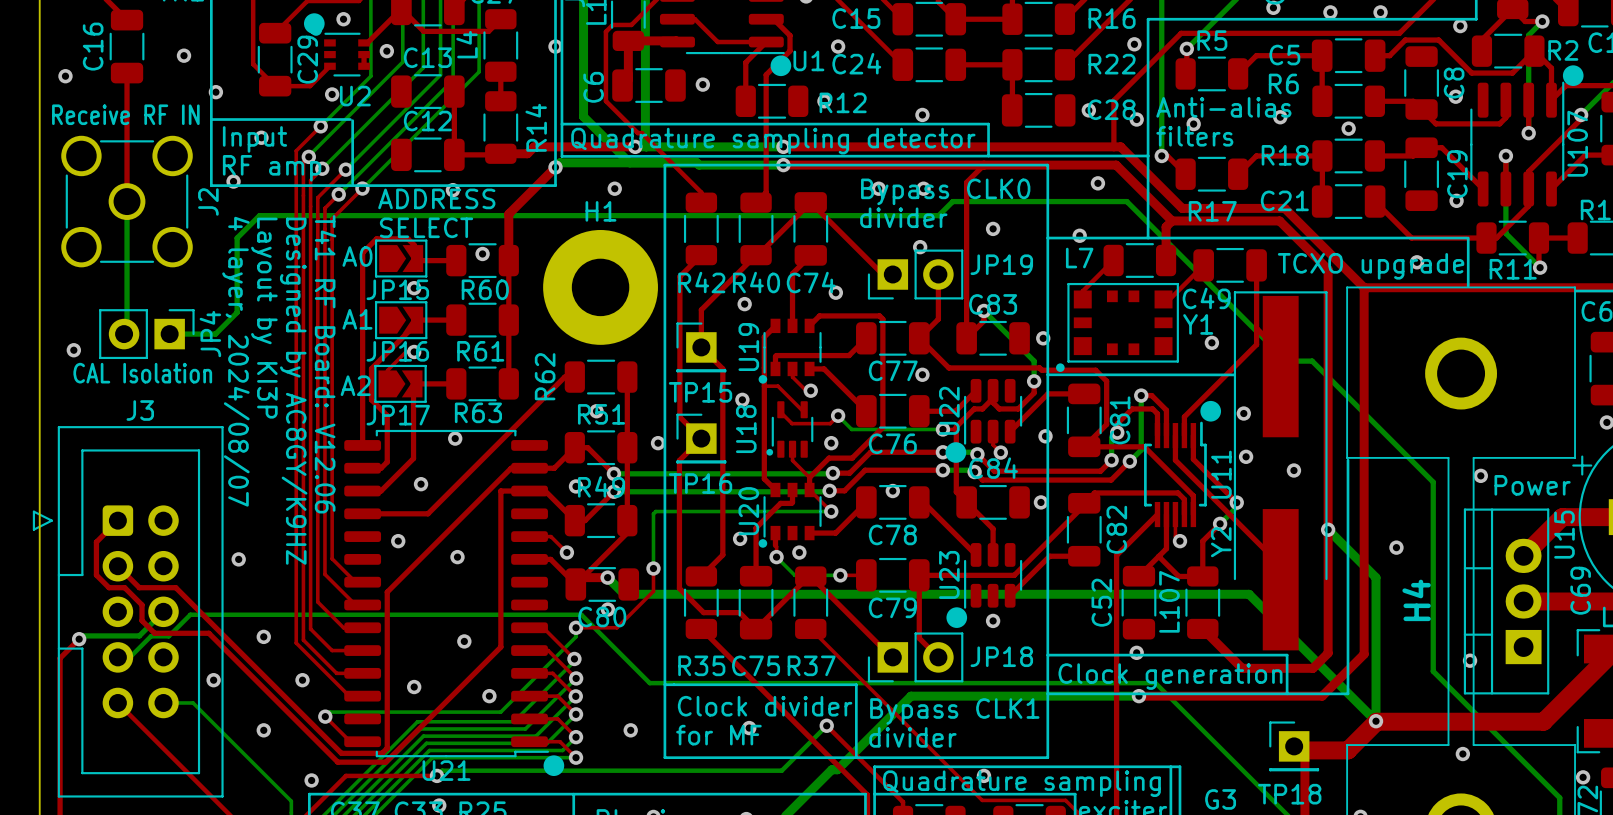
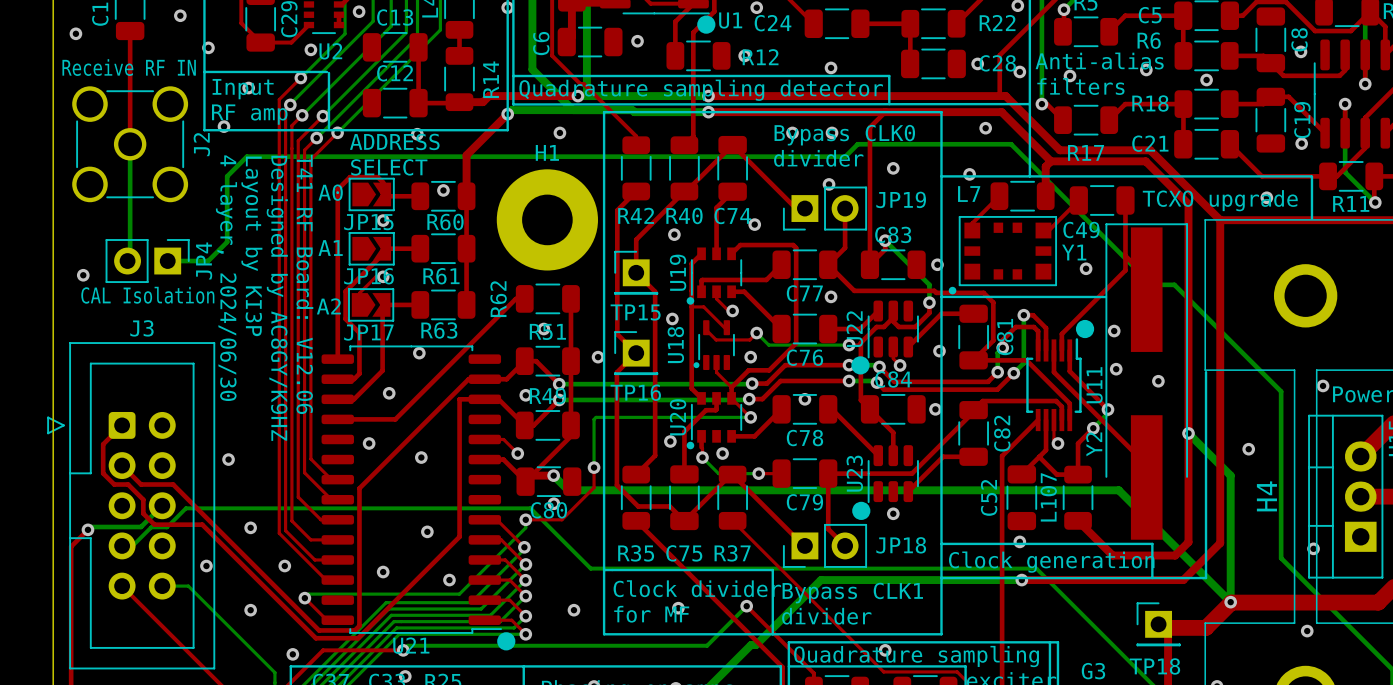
text: 4 layer, 2024/08/07 (235, 361) -> 4 layer, 2024/06/30 (226, 278)

